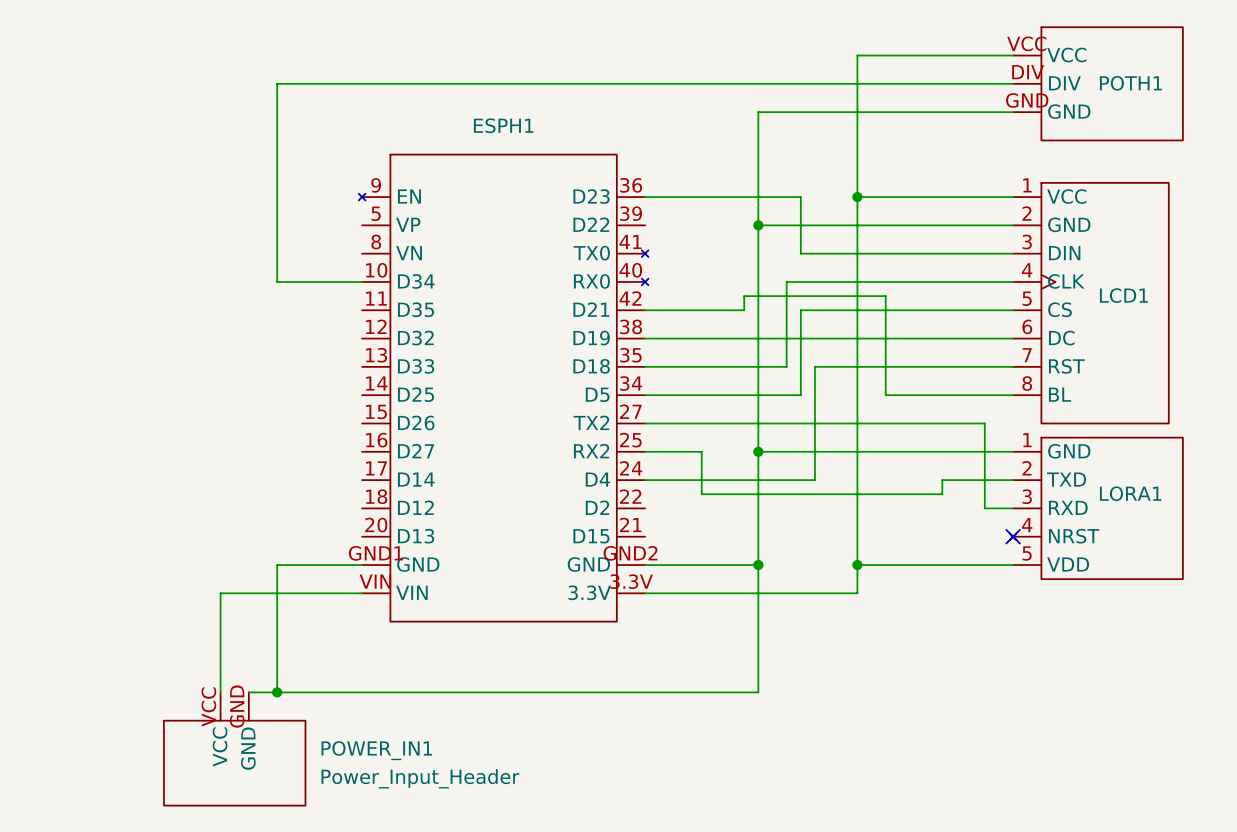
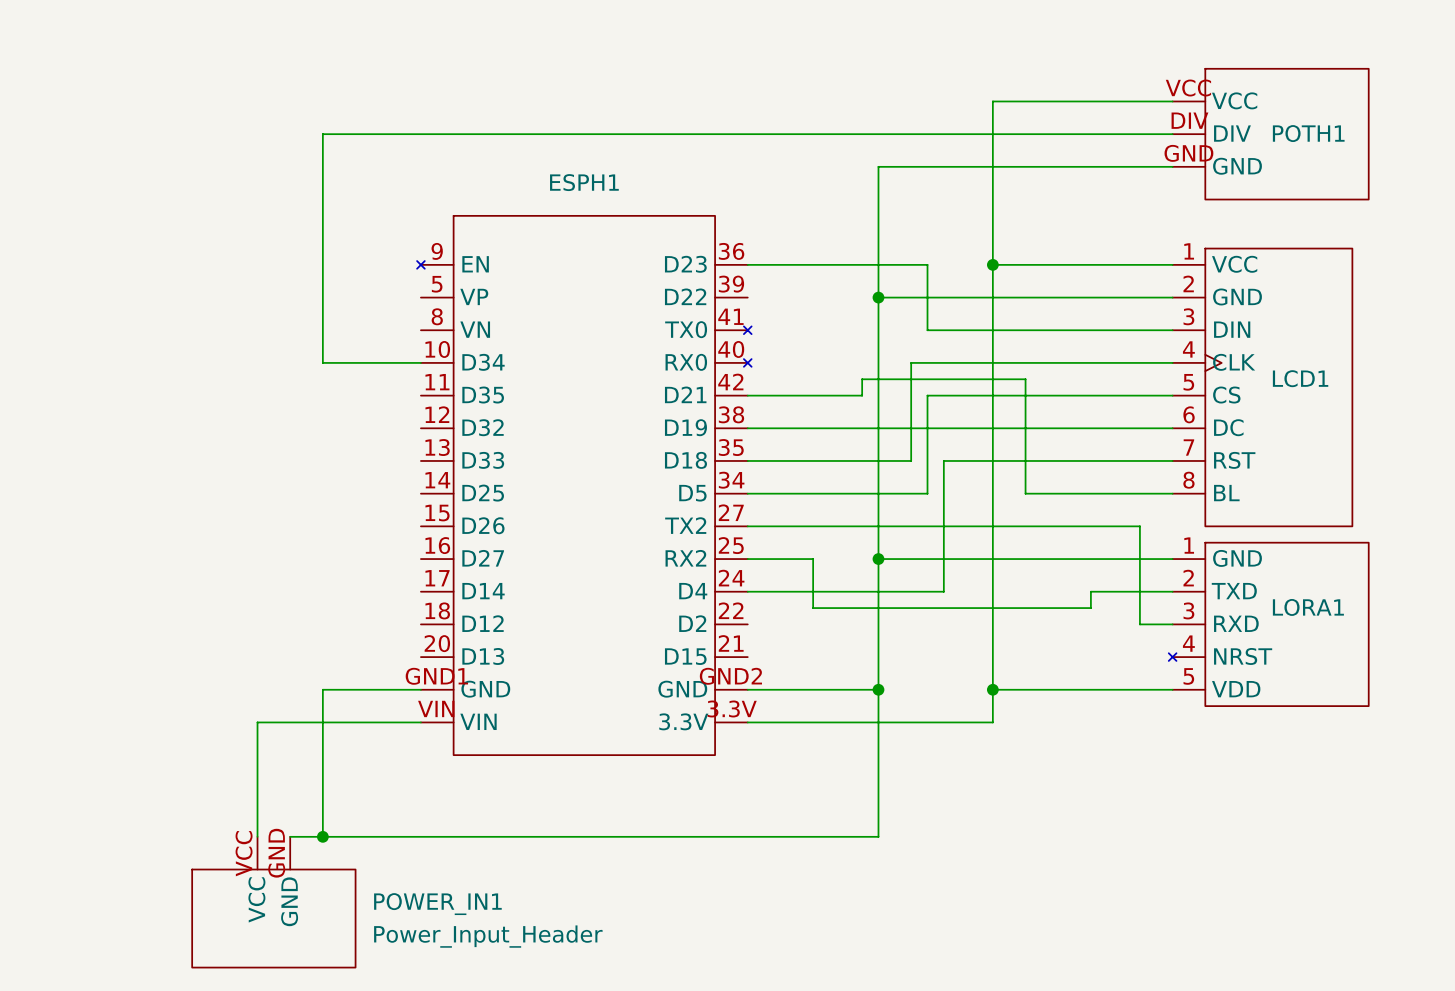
no-connect mark: (1013, 536) -> none

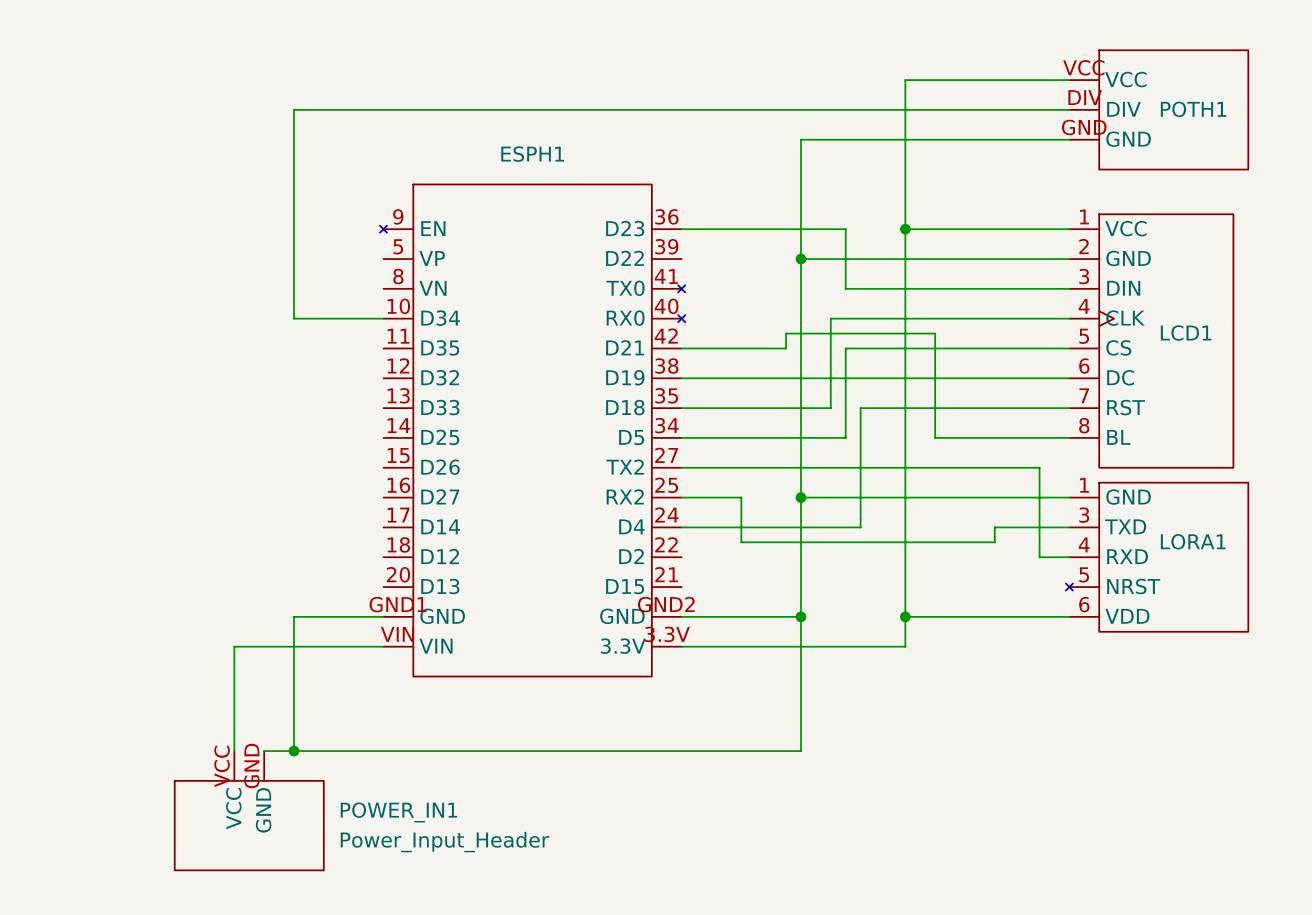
LORA1 pin number: 2 (1188, 578) -> 3 (1084, 515)
LORA1 pin number: 3 (1188, 610) -> 4 (1084, 544)
LORA1 pin number: 4 (1188, 643) -> 5 (1084, 574)
LORA1 pin number: 5 (1188, 676) -> 6 (1084, 604)

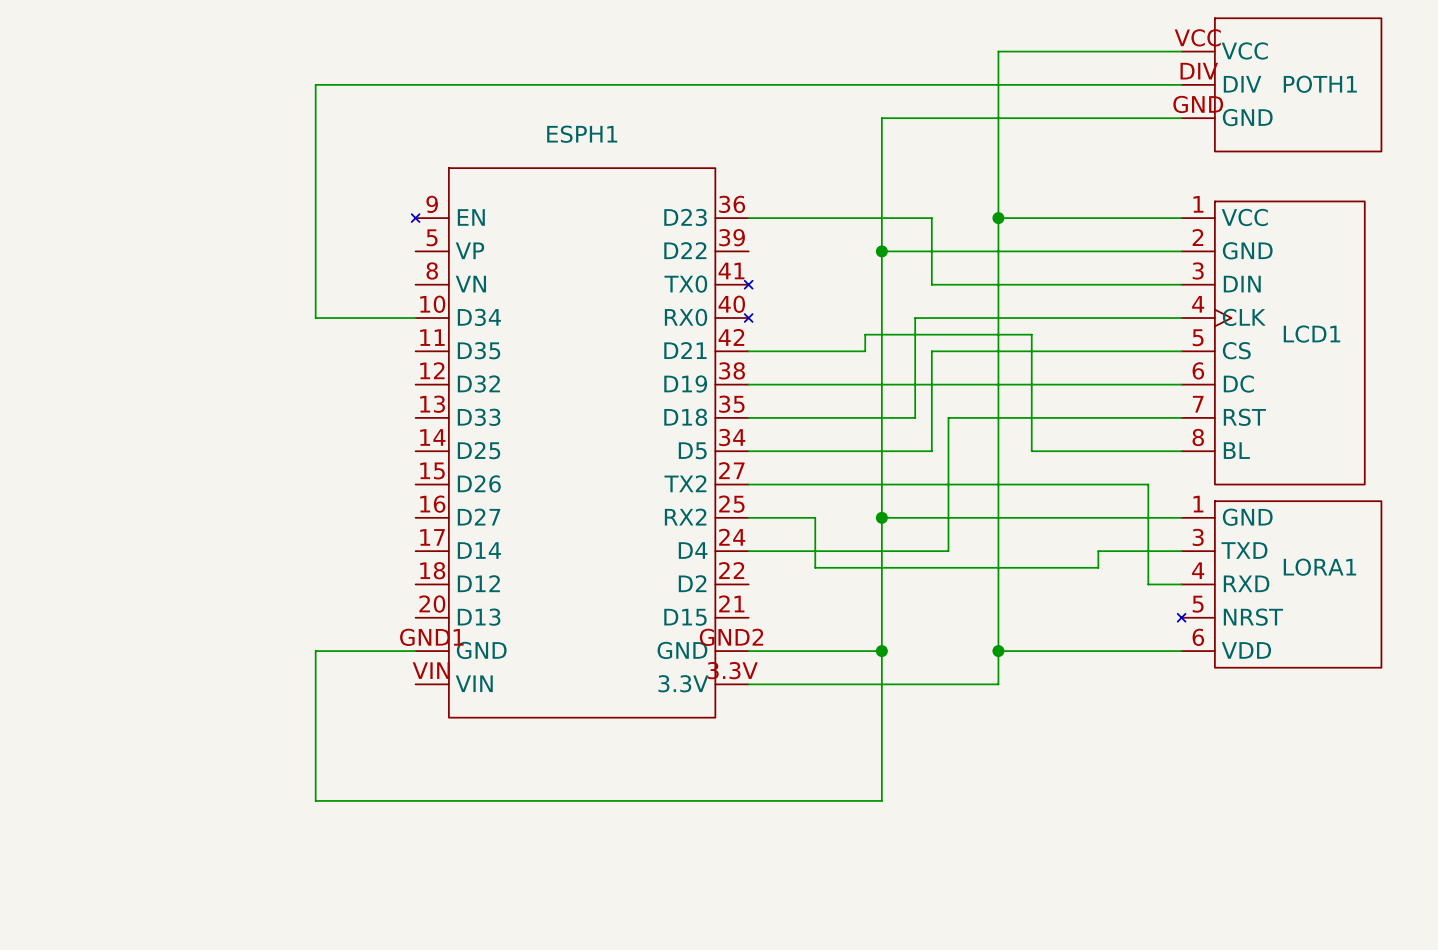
wire: (383, 646) (234, 646) (234, 751) -> none
wire: (264, 751) (294, 751) -> none
junction: (294, 751) -> none
POWER_IN1: Power_Input_Header (249, 810) -> none

